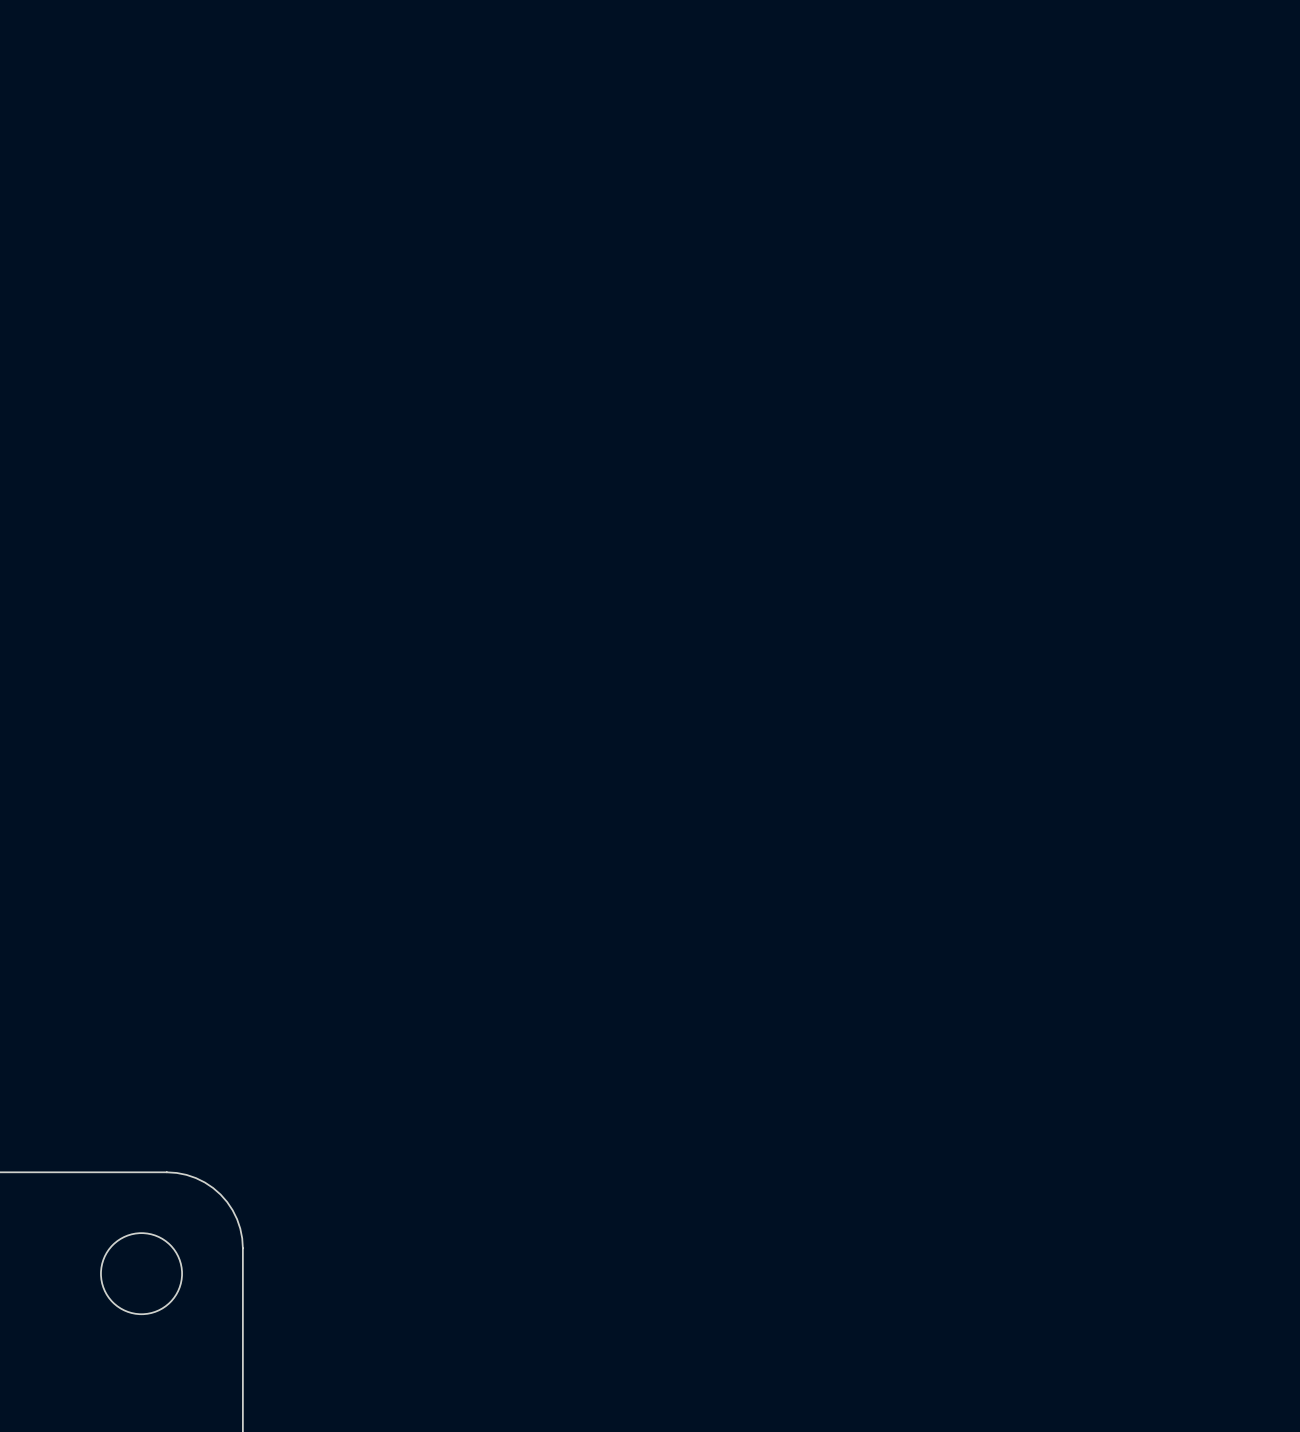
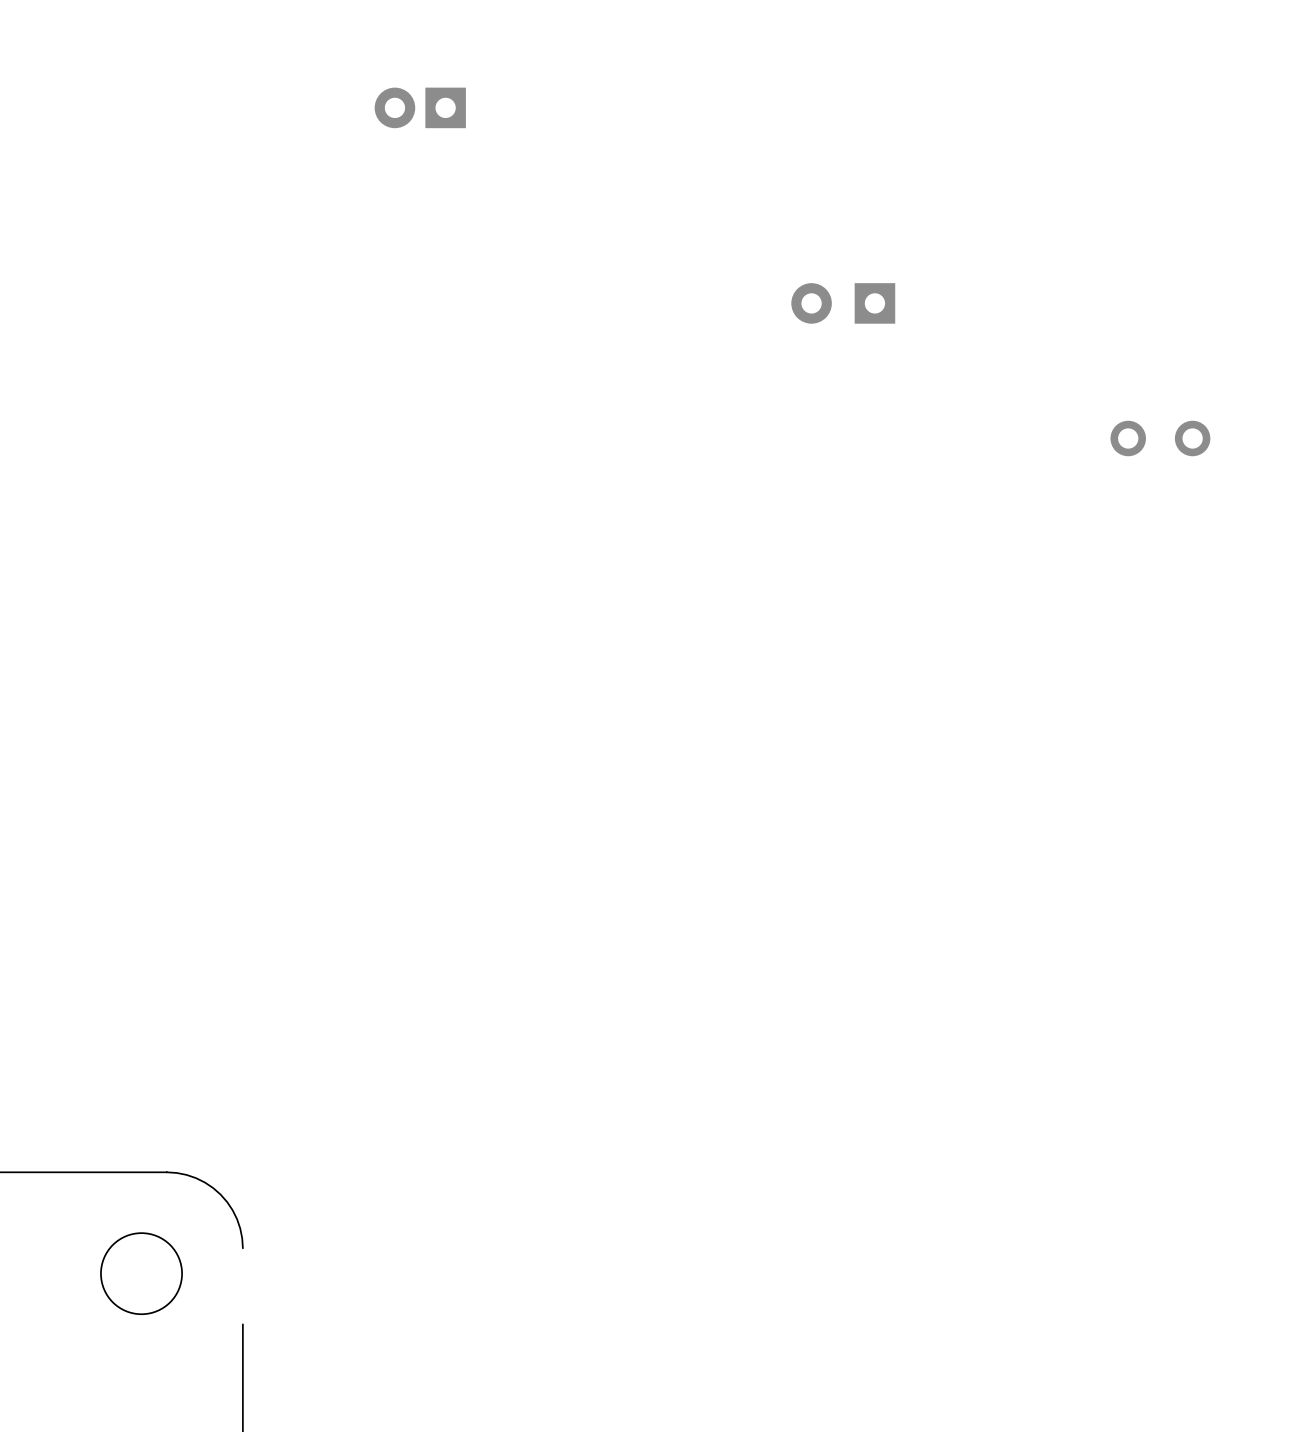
part: none -> (420, 107)
part: none -> (843, 303)
part: none -> (1160, 438)
board edge: (242, 1248) (242, 1324) -> none

